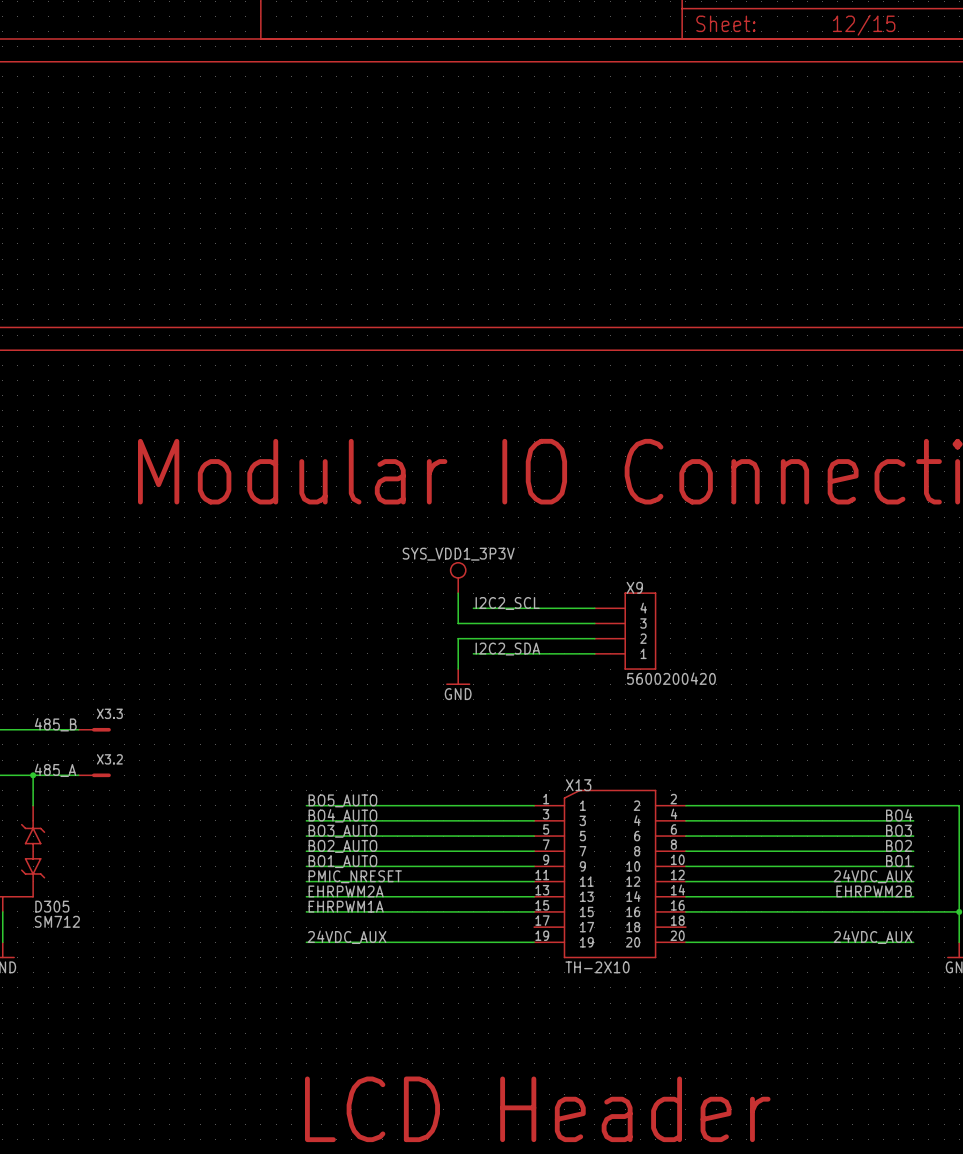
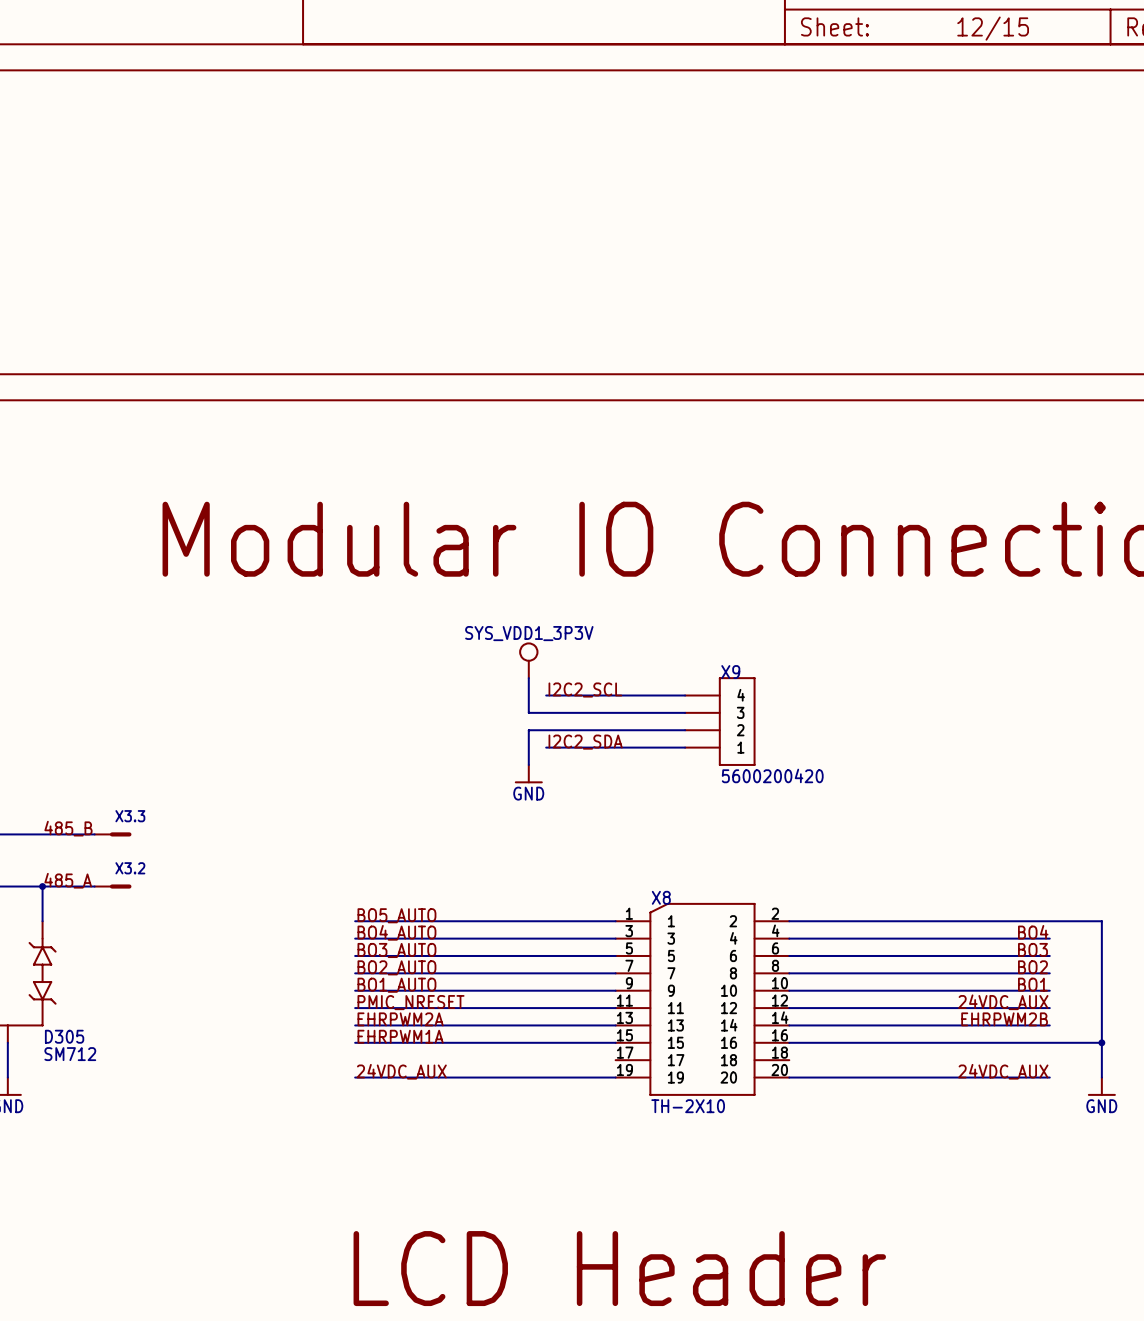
X13 name: X13 (578, 785) -> X8 (661, 897)

